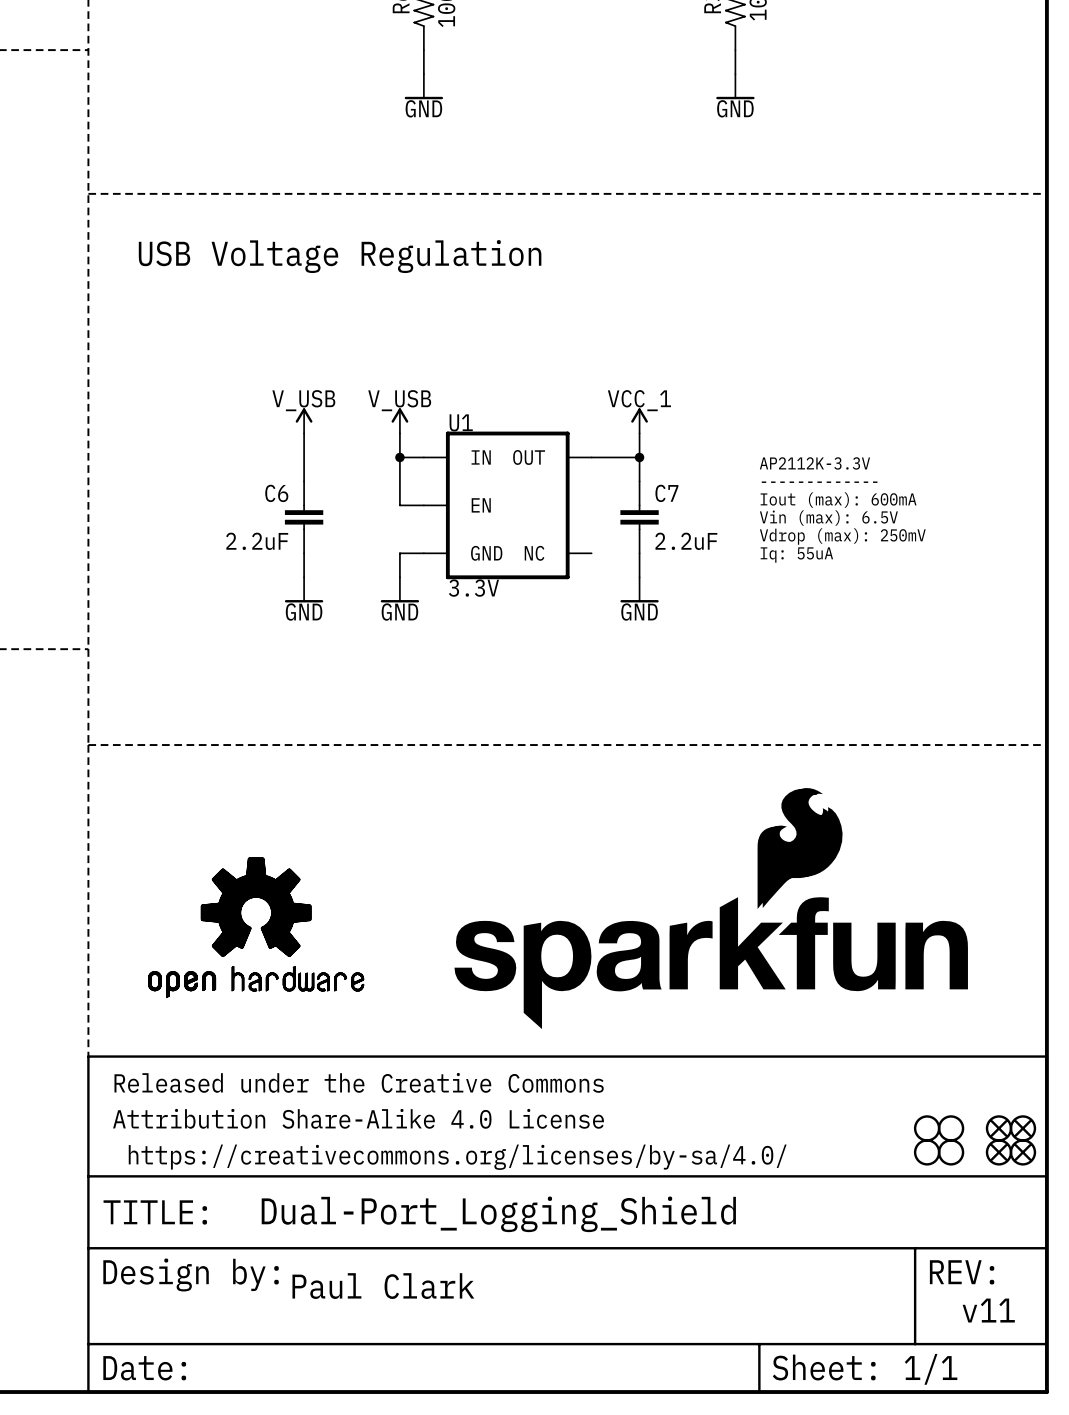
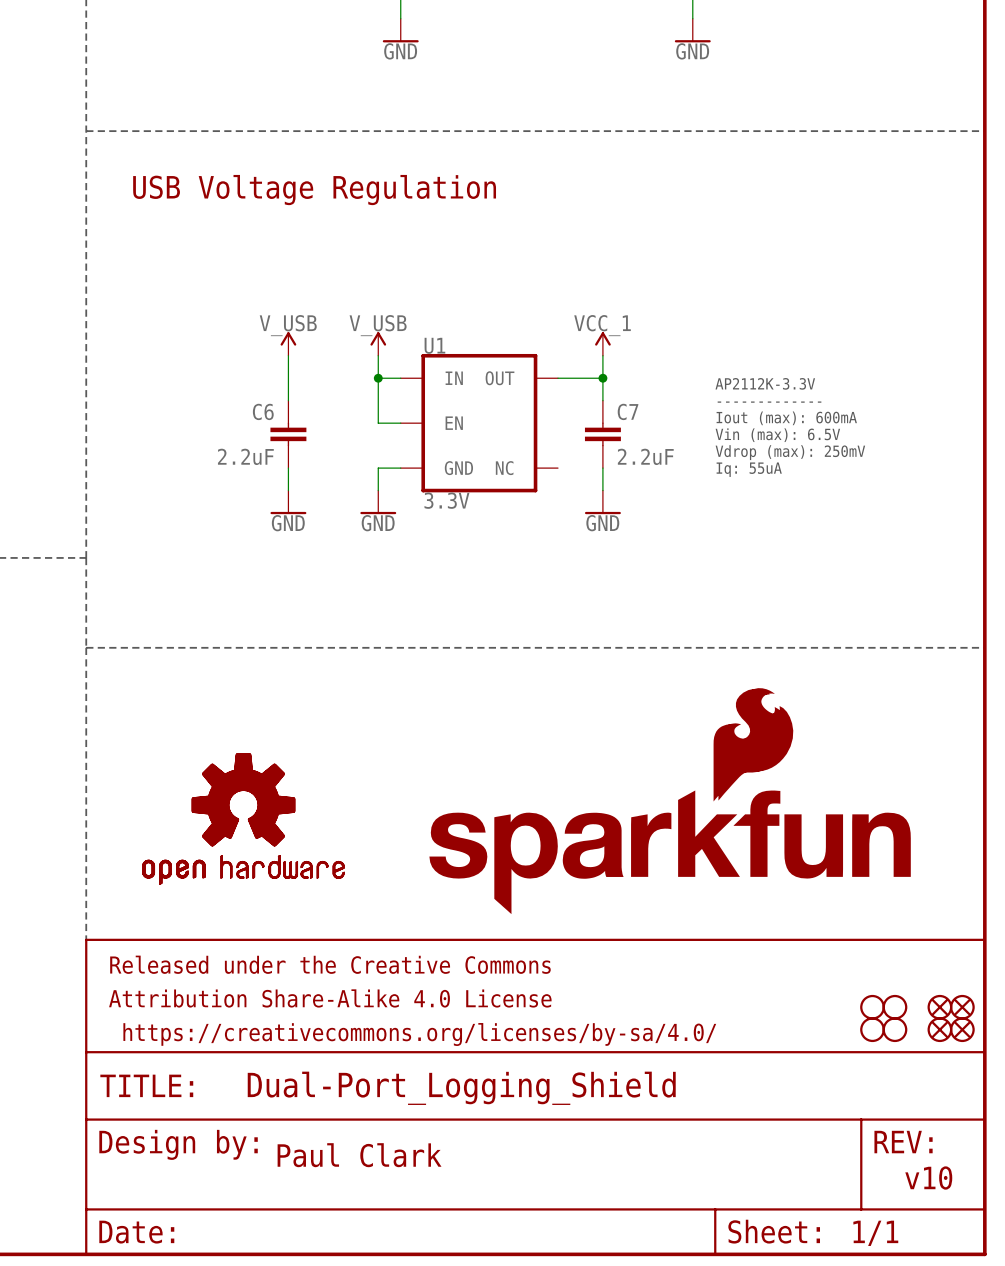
text: v11 (988, 1310) -> v10 (928, 1178)

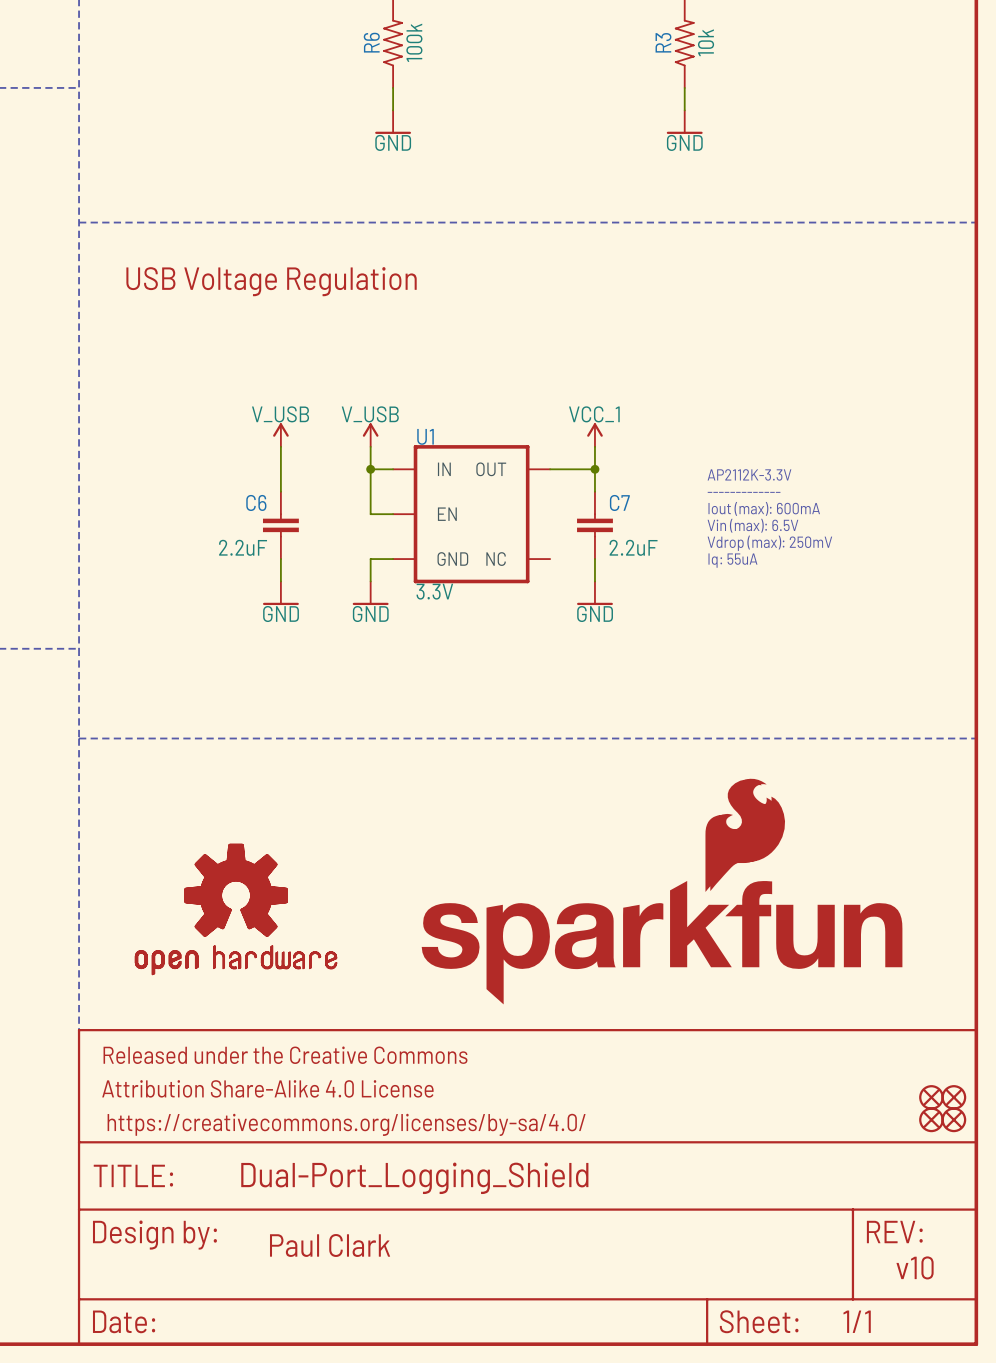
part: (872, 1007) -> none
part: (894, 1007) -> none
part: (872, 1029) -> none
part: (894, 1029) -> none

